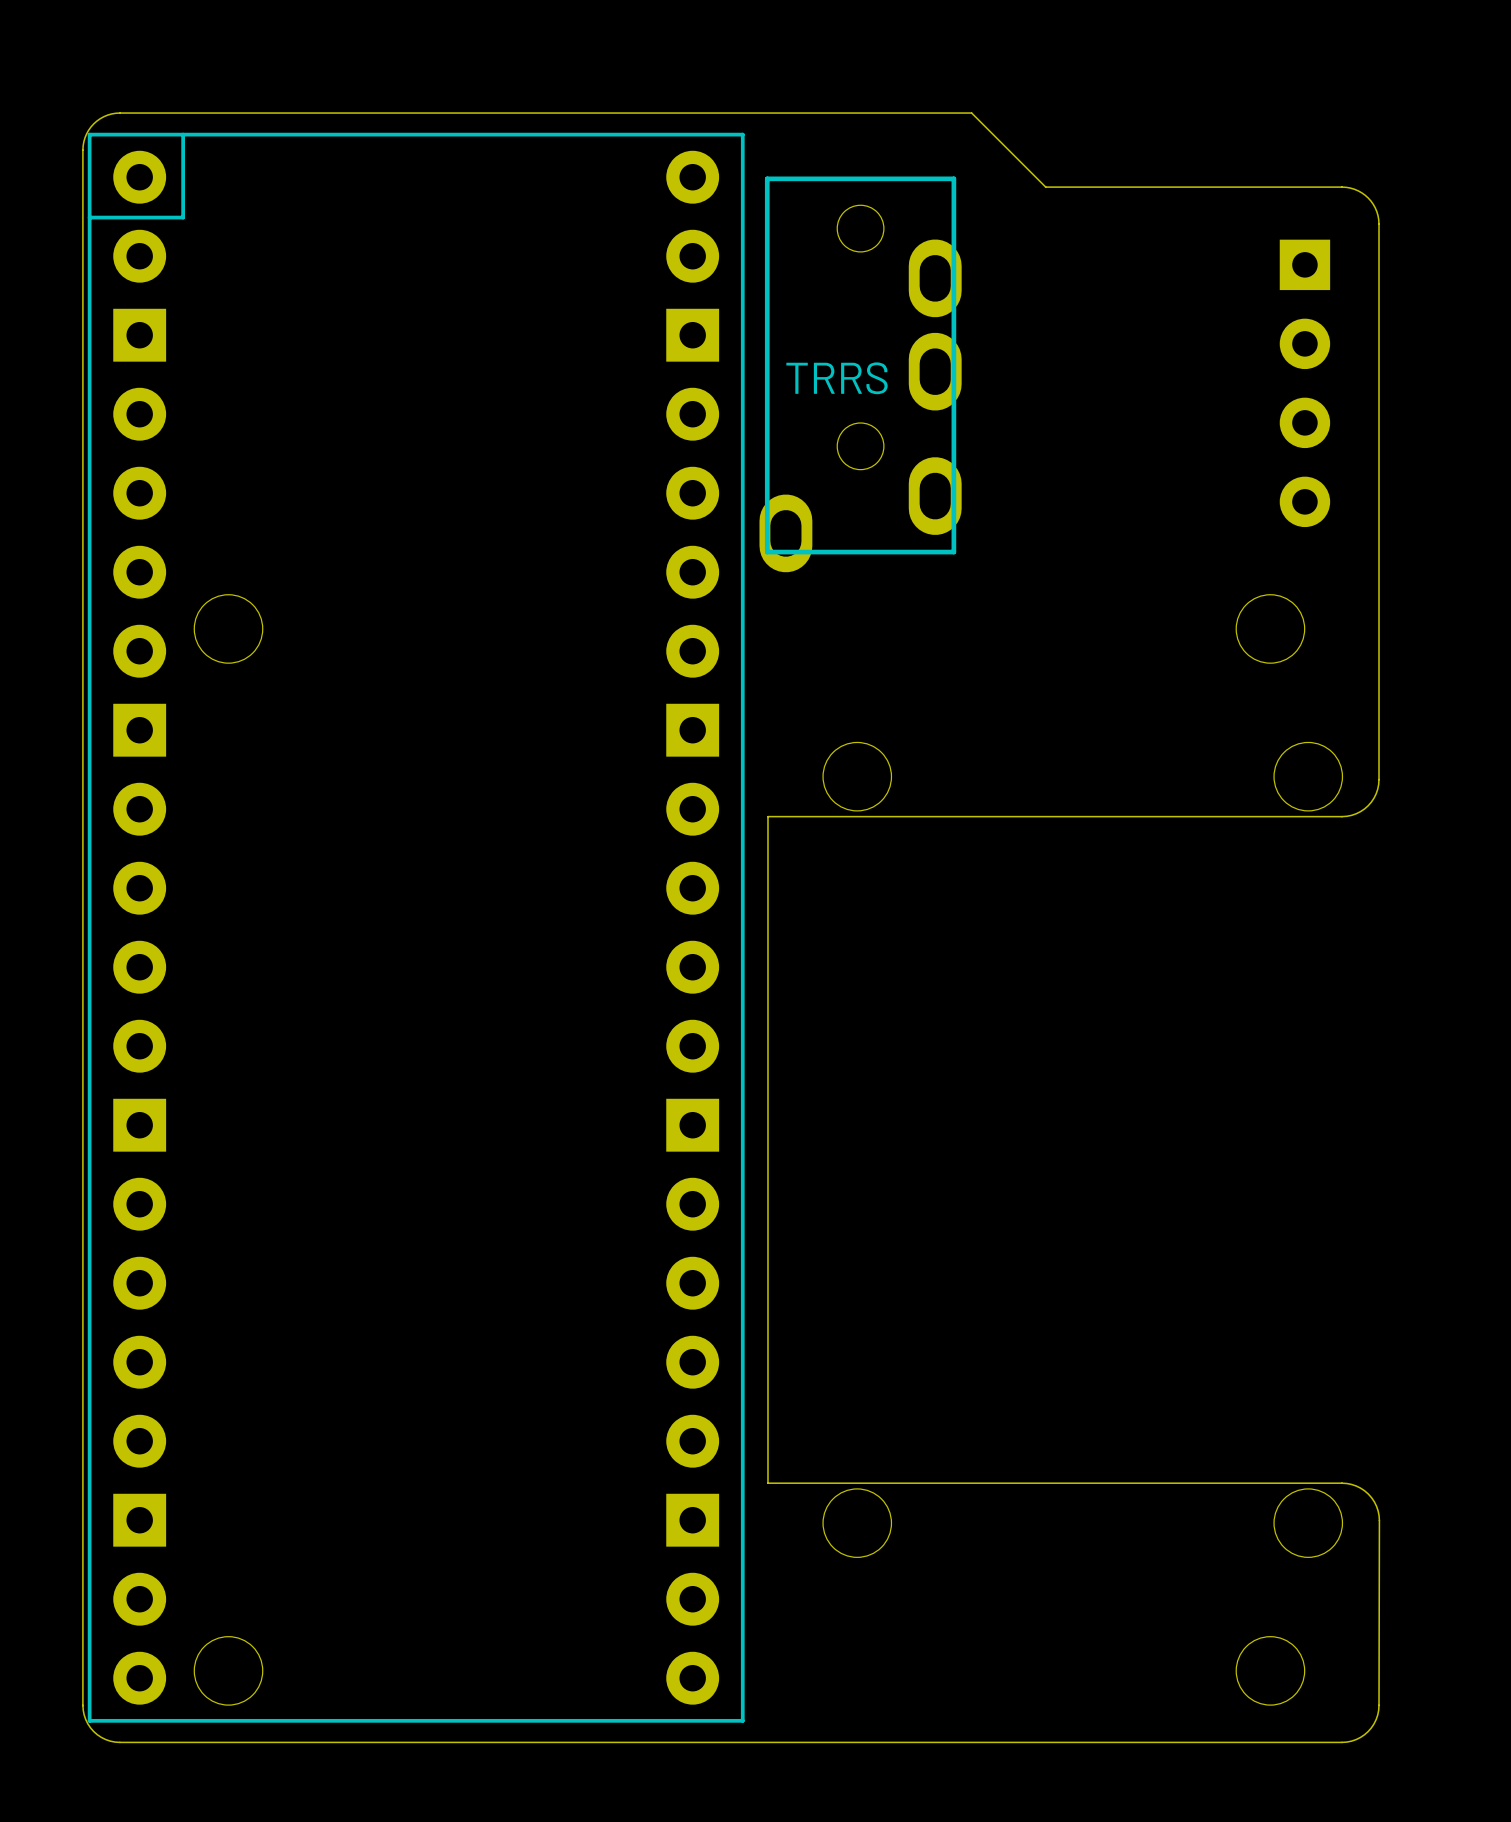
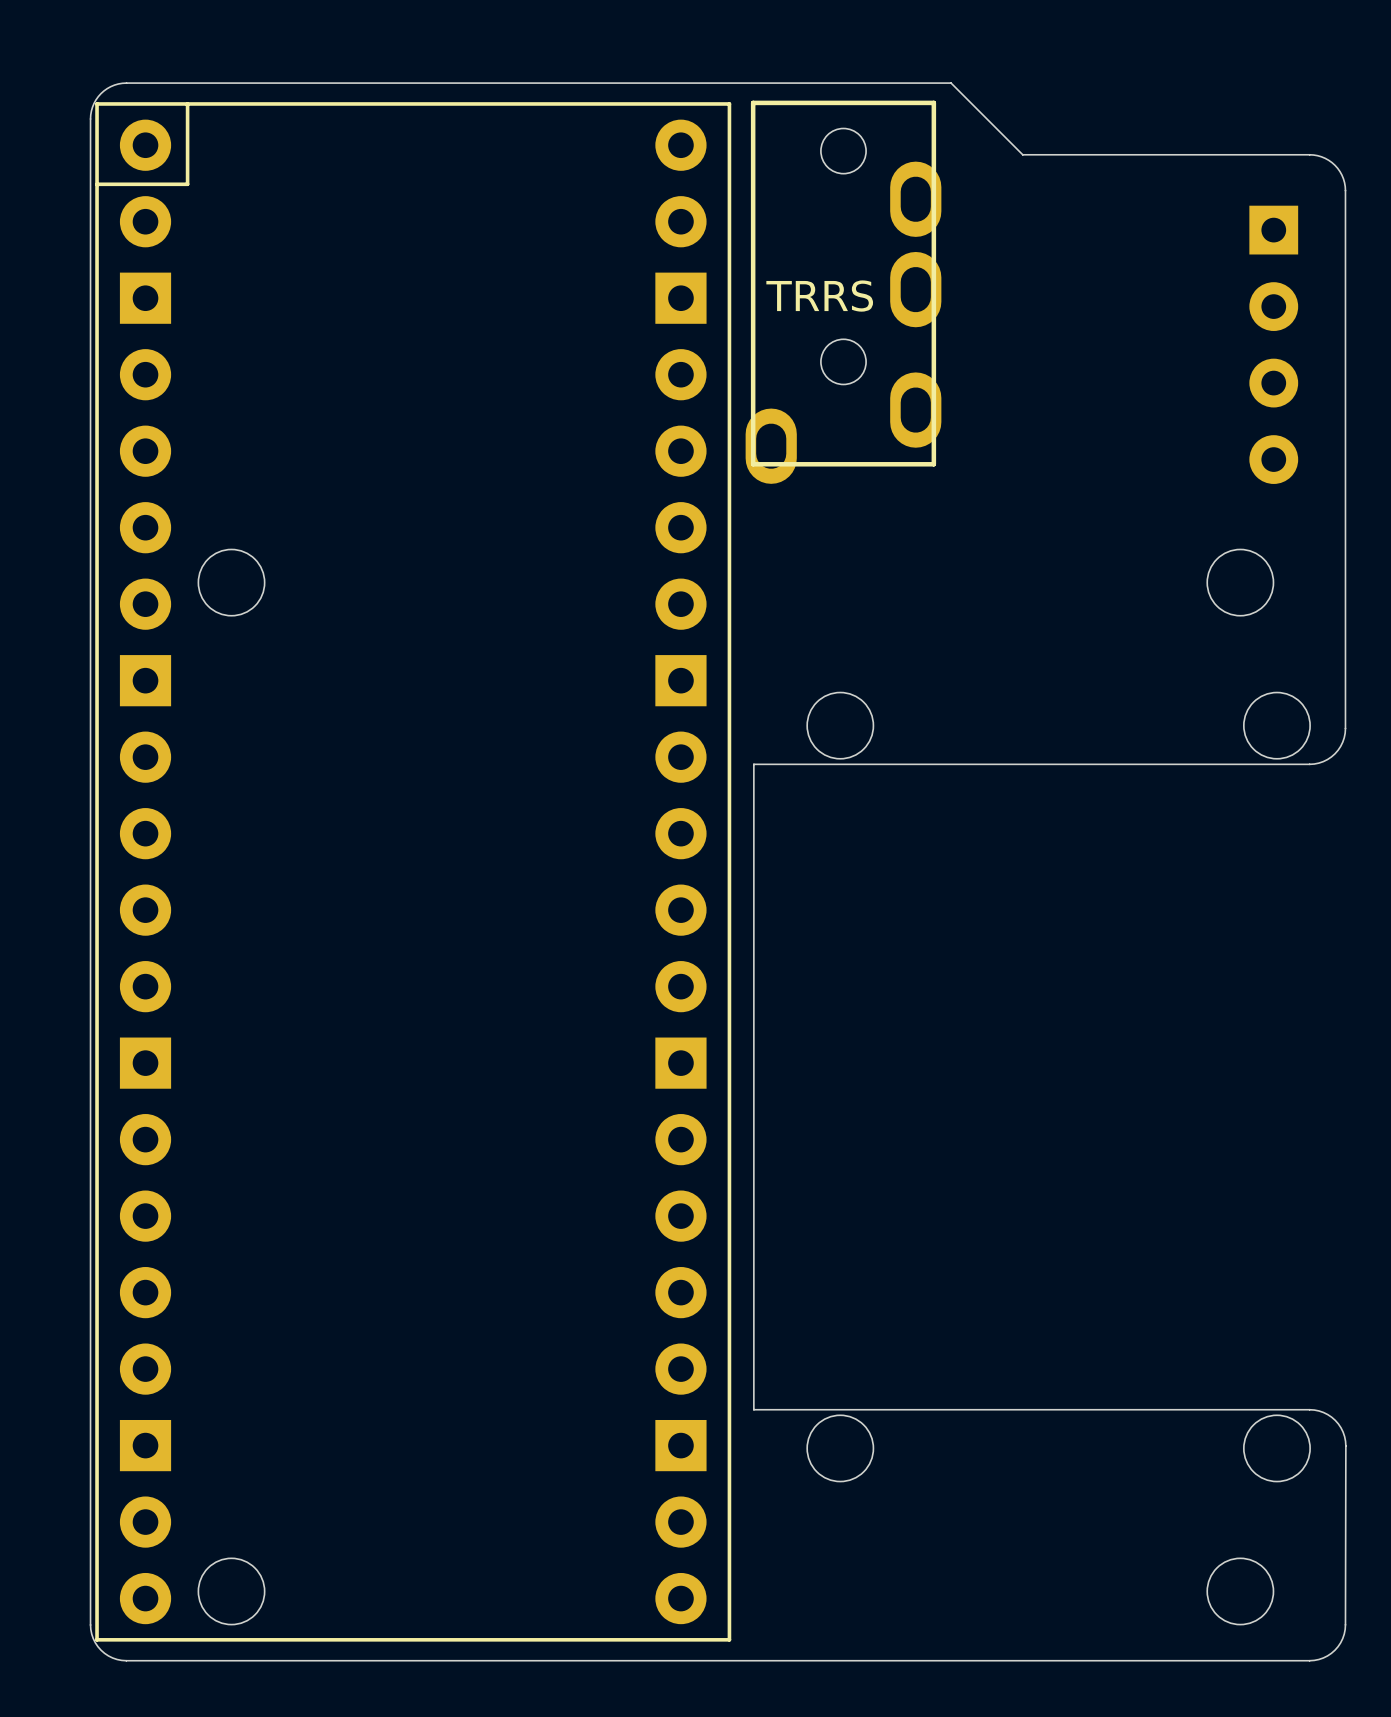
part position: (860, 374) -> (843, 292)

